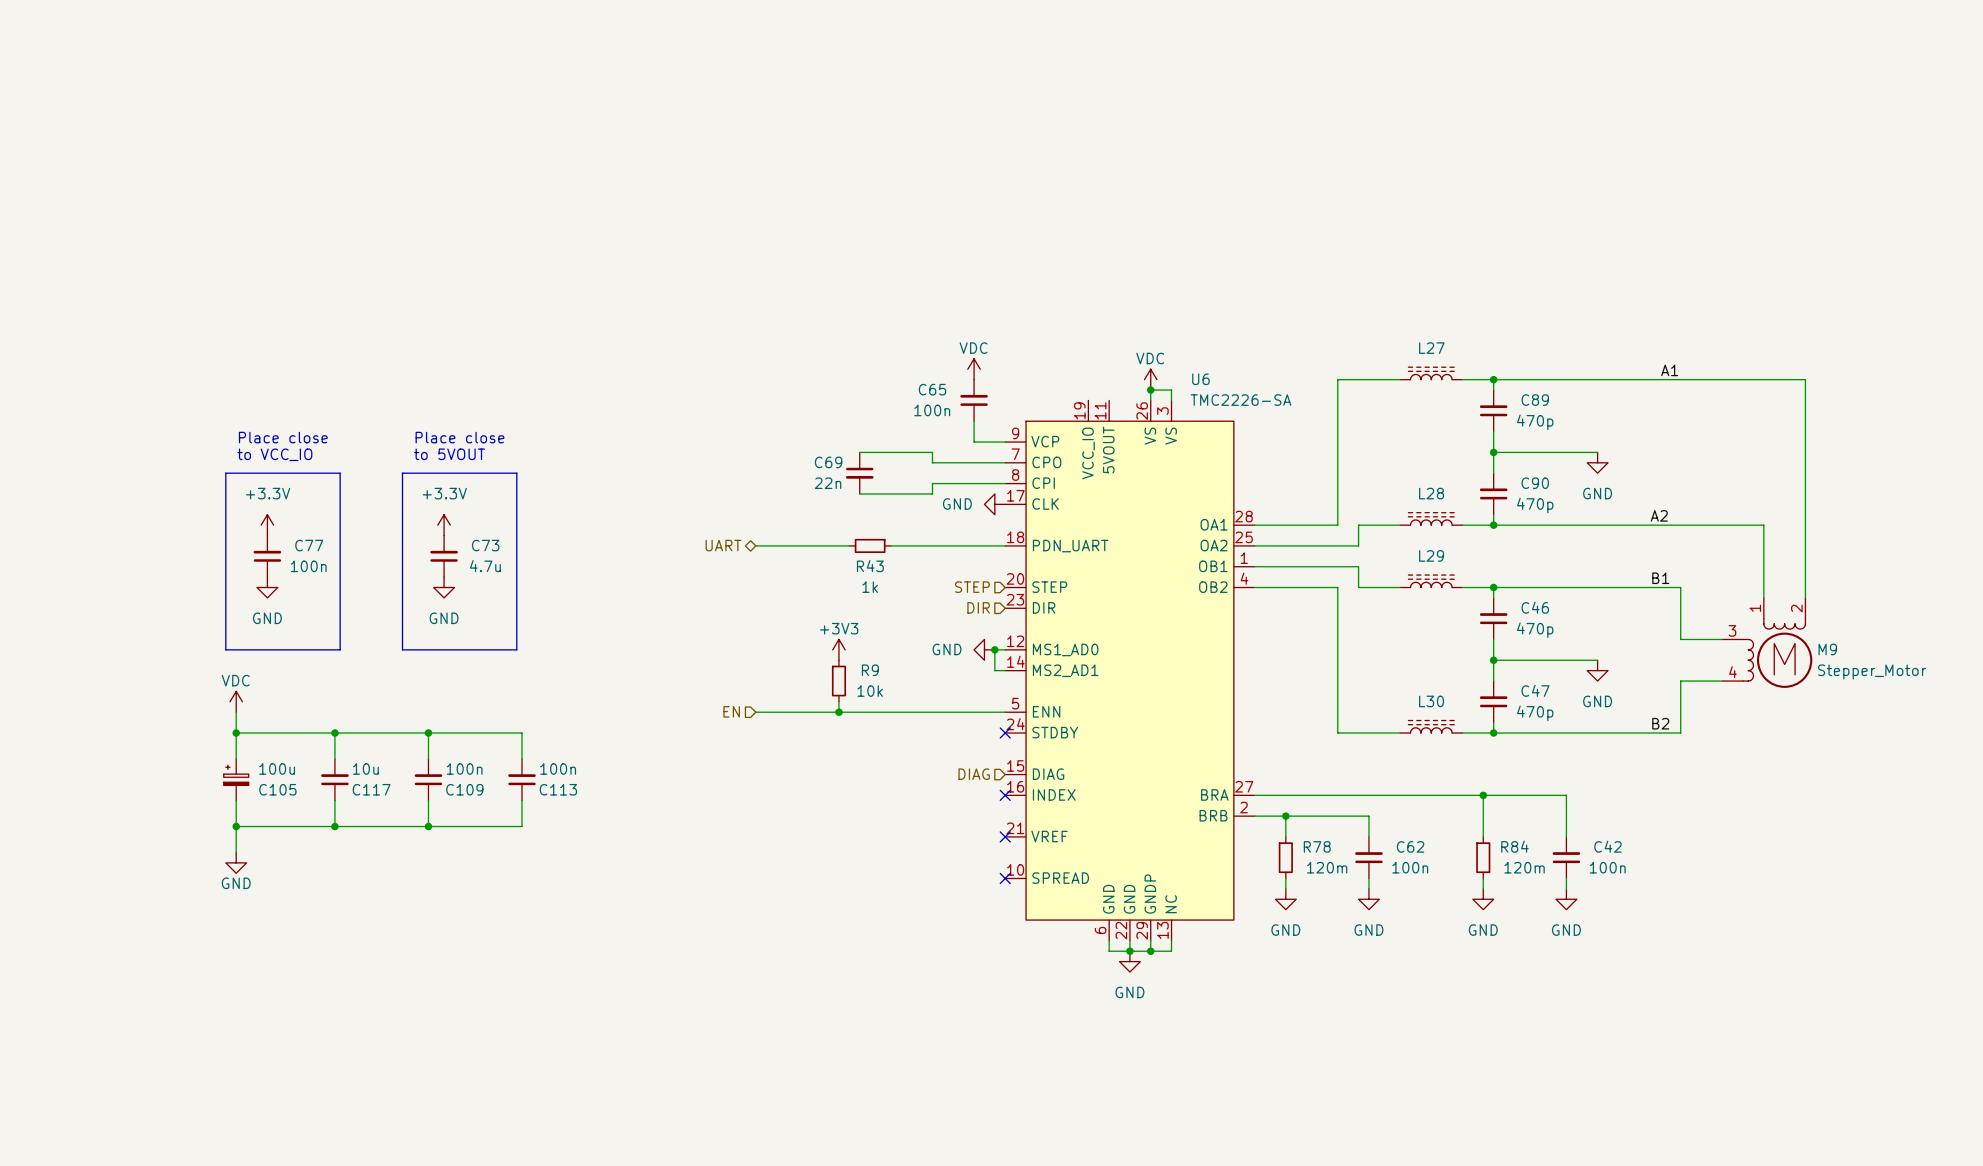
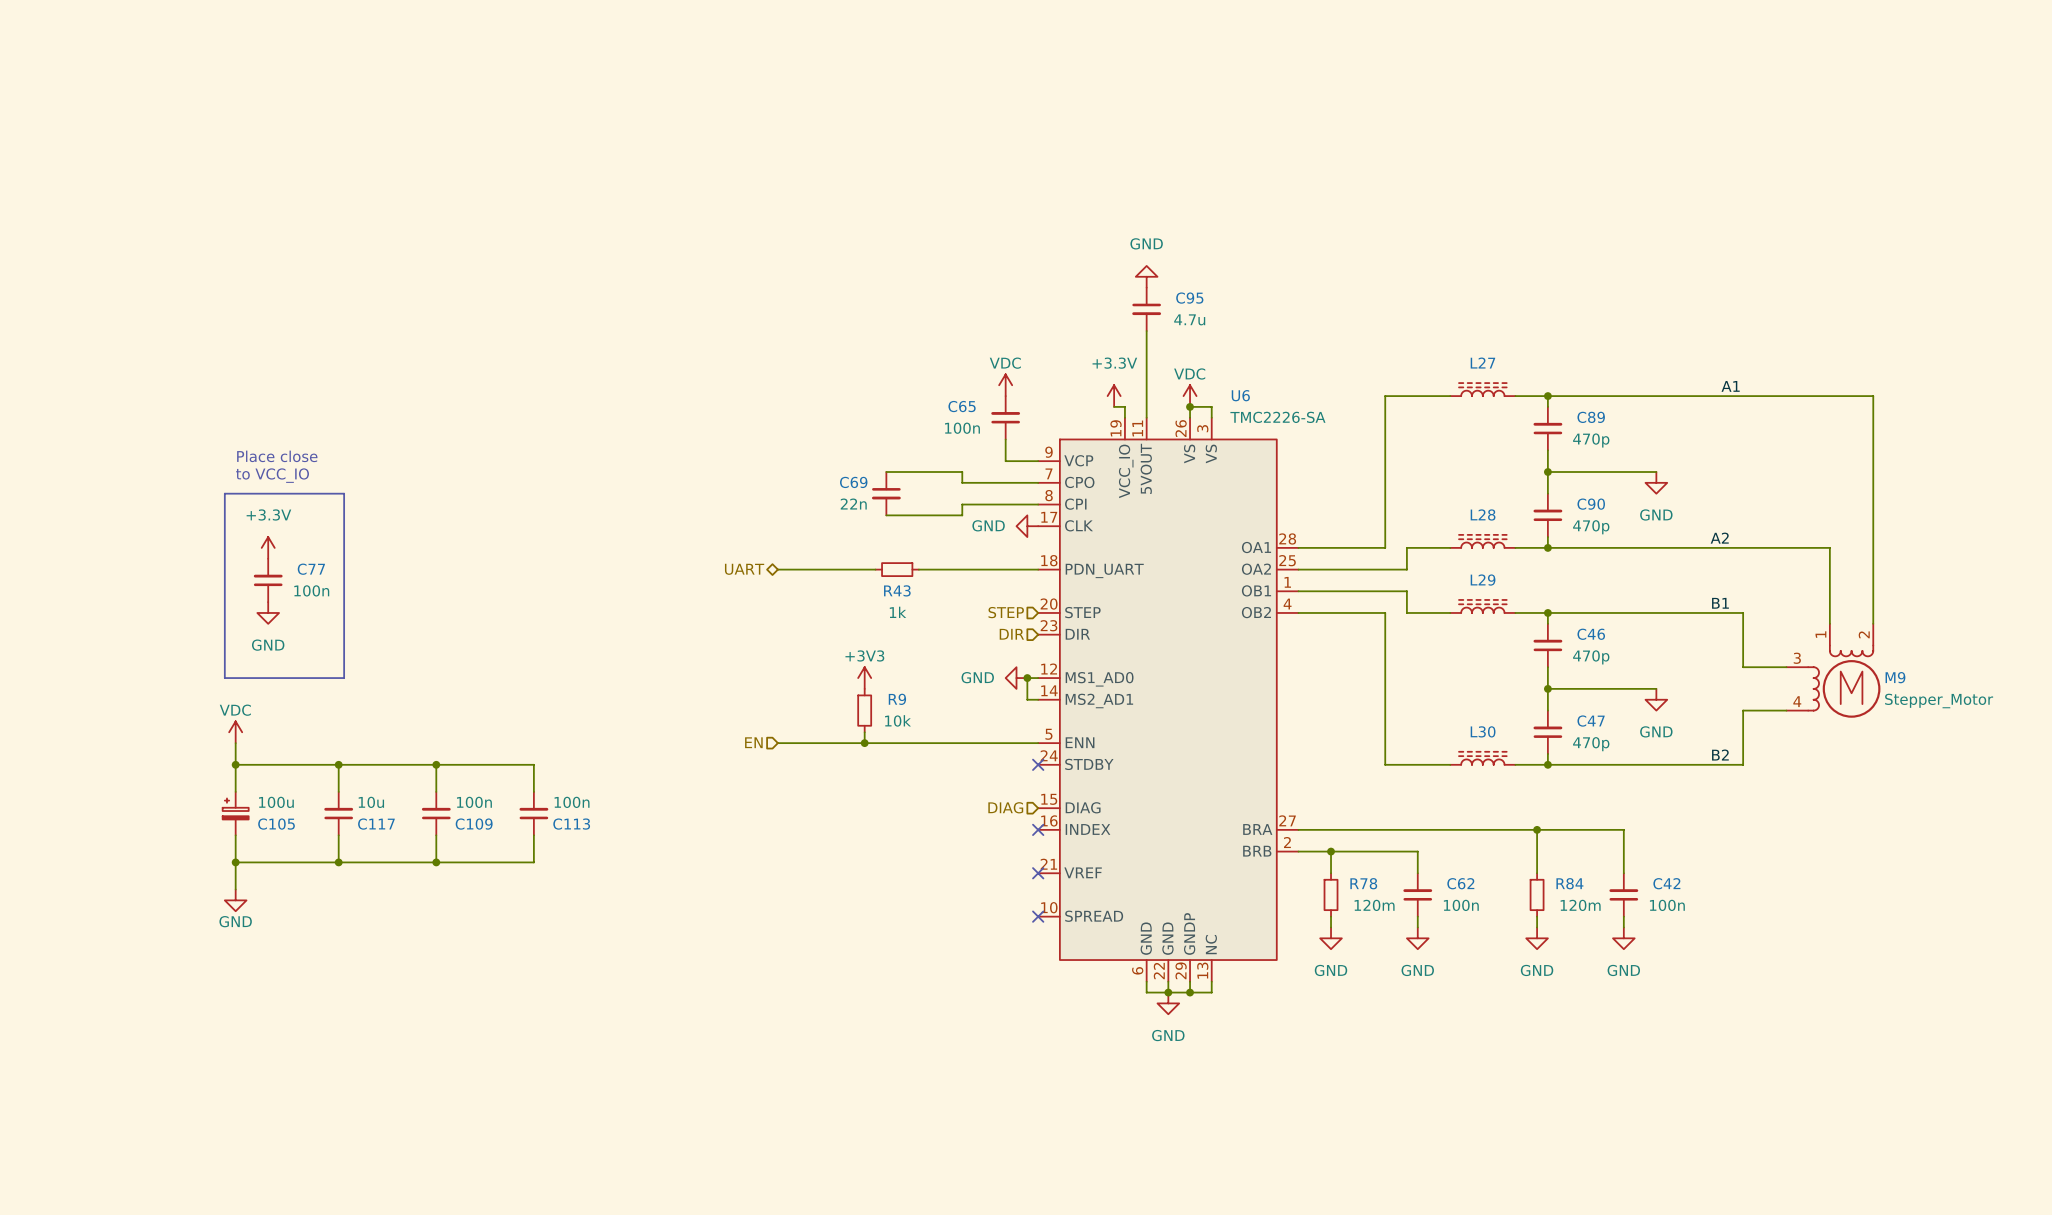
power symbol: none -> GND (1146, 276)
C95: none -> 4.7u (1146, 309)
wire: none -> (1146, 331) (1146, 417)
power symbol: none -> +3.3V (1114, 396)
wire: none -> (1114, 406) (1124, 406) (1124, 417)
text: Place close (459, 437) -> none
text: to 5VOUT (449, 454) -> none
line: (402, 473) (516, 473) (516, 649) (402, 649) (402, 473) -> none
power symbol: +3.3V (444, 525) -> none
C73: 4.7u (444, 556) -> none
power symbol: GND (444, 587) -> none

